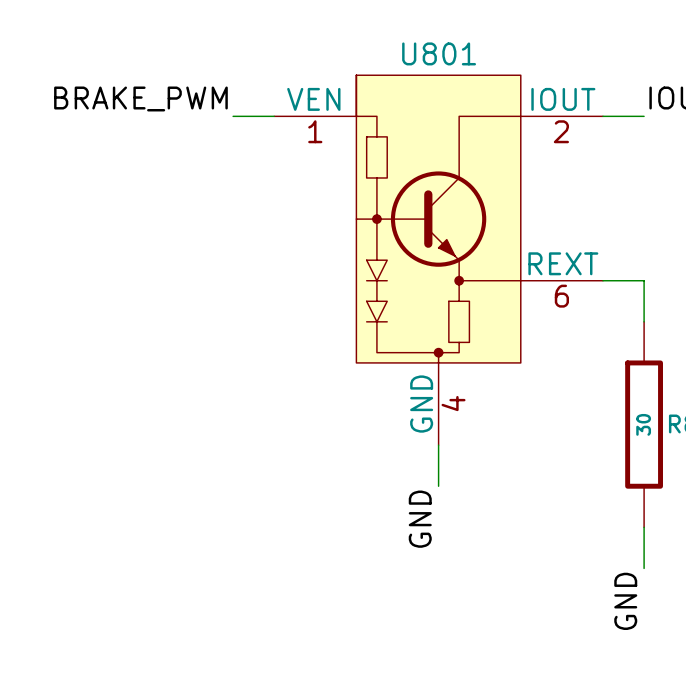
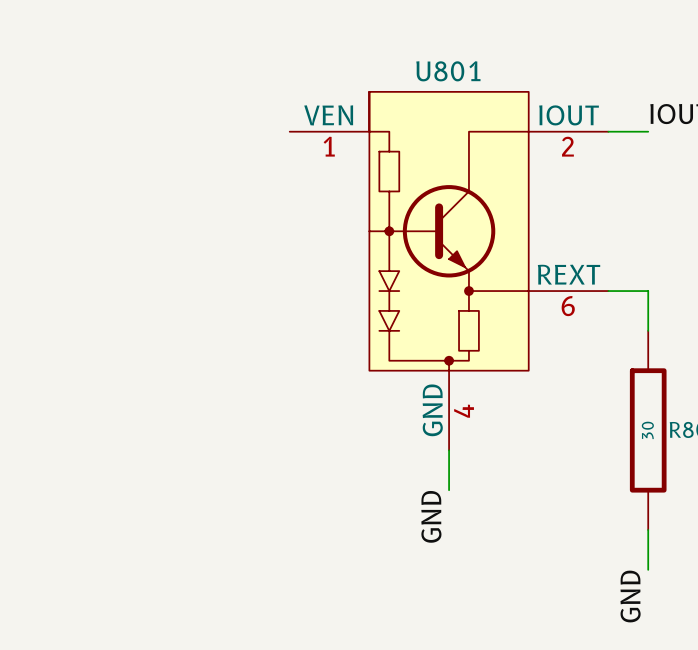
label: BRAKE_PWM (140, 98) -> none
wire: (233, 116) (274, 116) -> none

